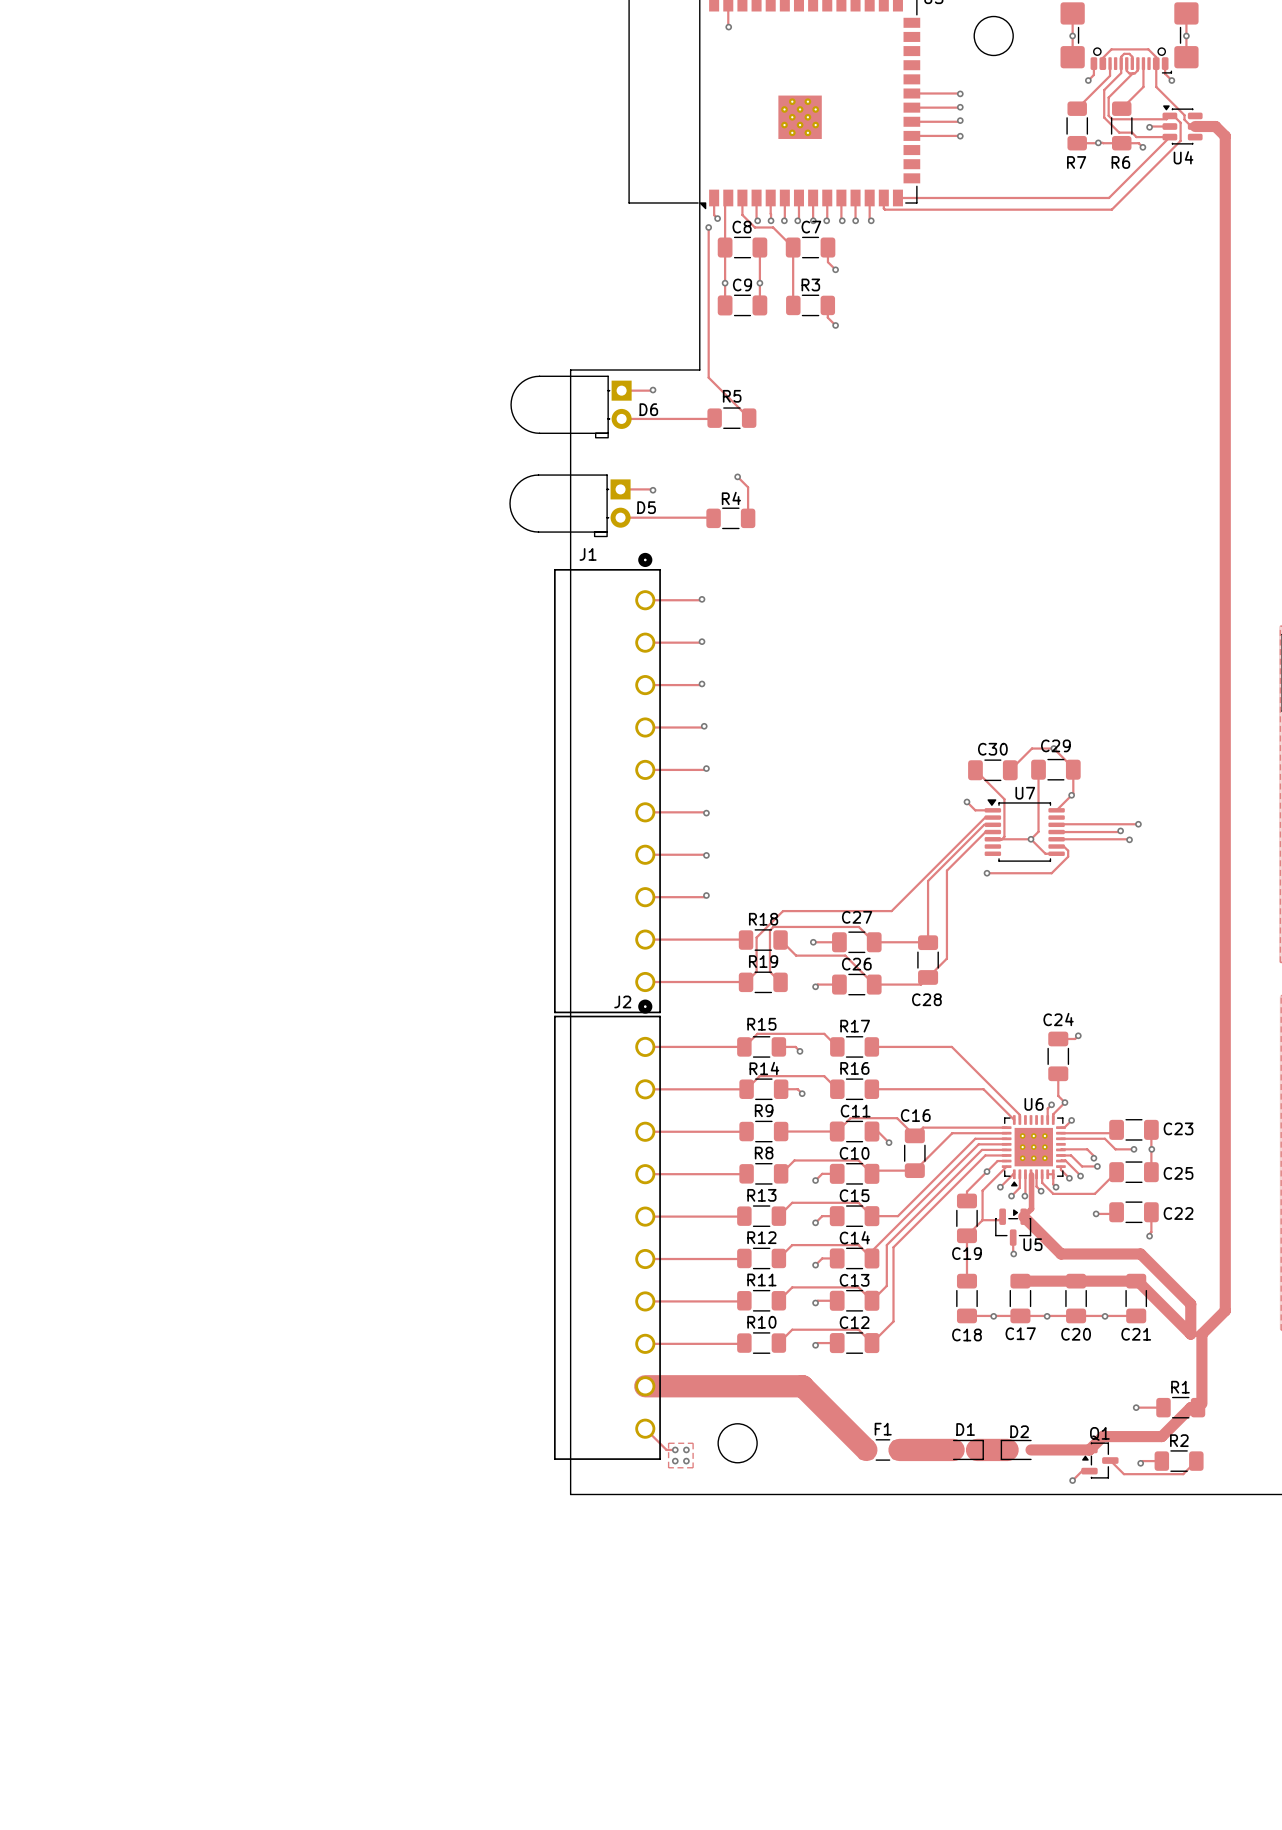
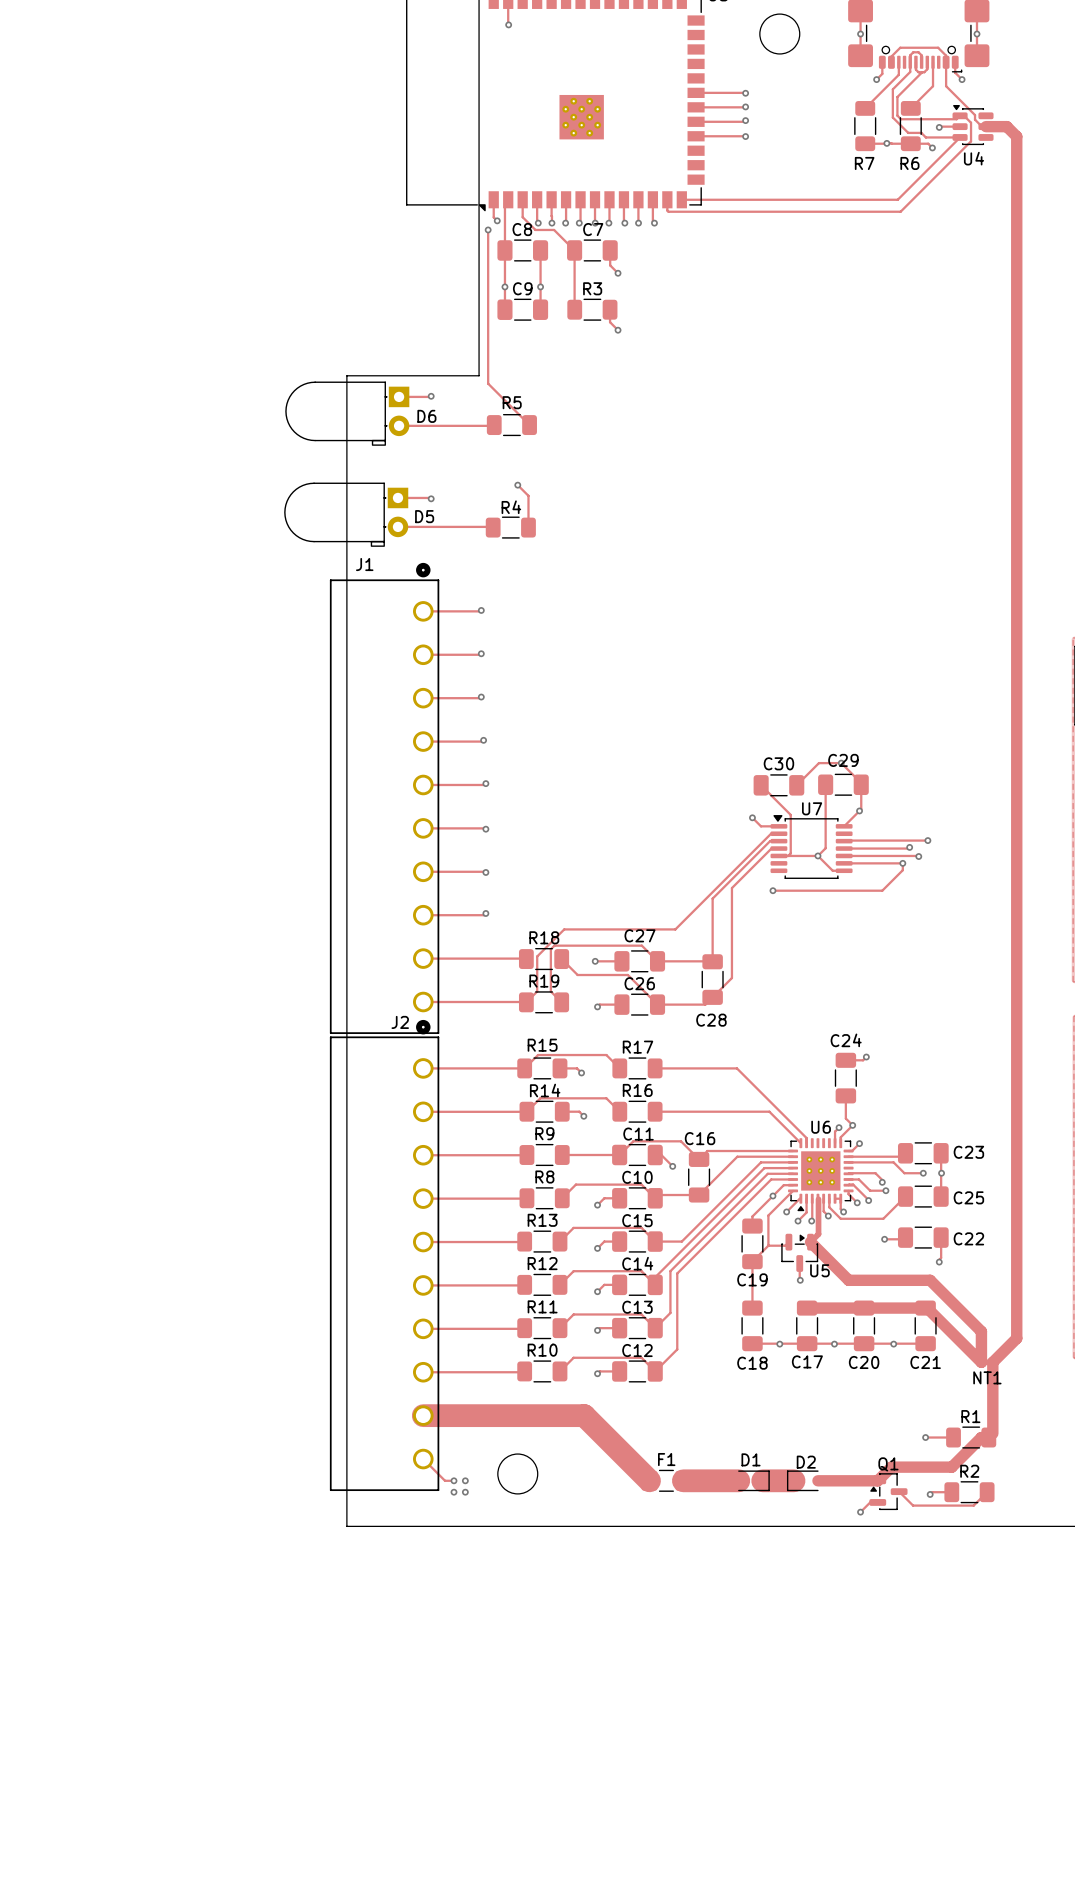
track: (1063, 846) (1068, 850) (1068, 856) (1051, 873) -> (851, 863) (902, 863) (902, 870) (882, 890) (839, 890)
via: none -> (902, 863)
NT1 name: none -> NT1 (987, 1377)
zone outline: (668, 1443) (693, 1443) (693, 1467) (668, 1467) (668, 1443) -> none

